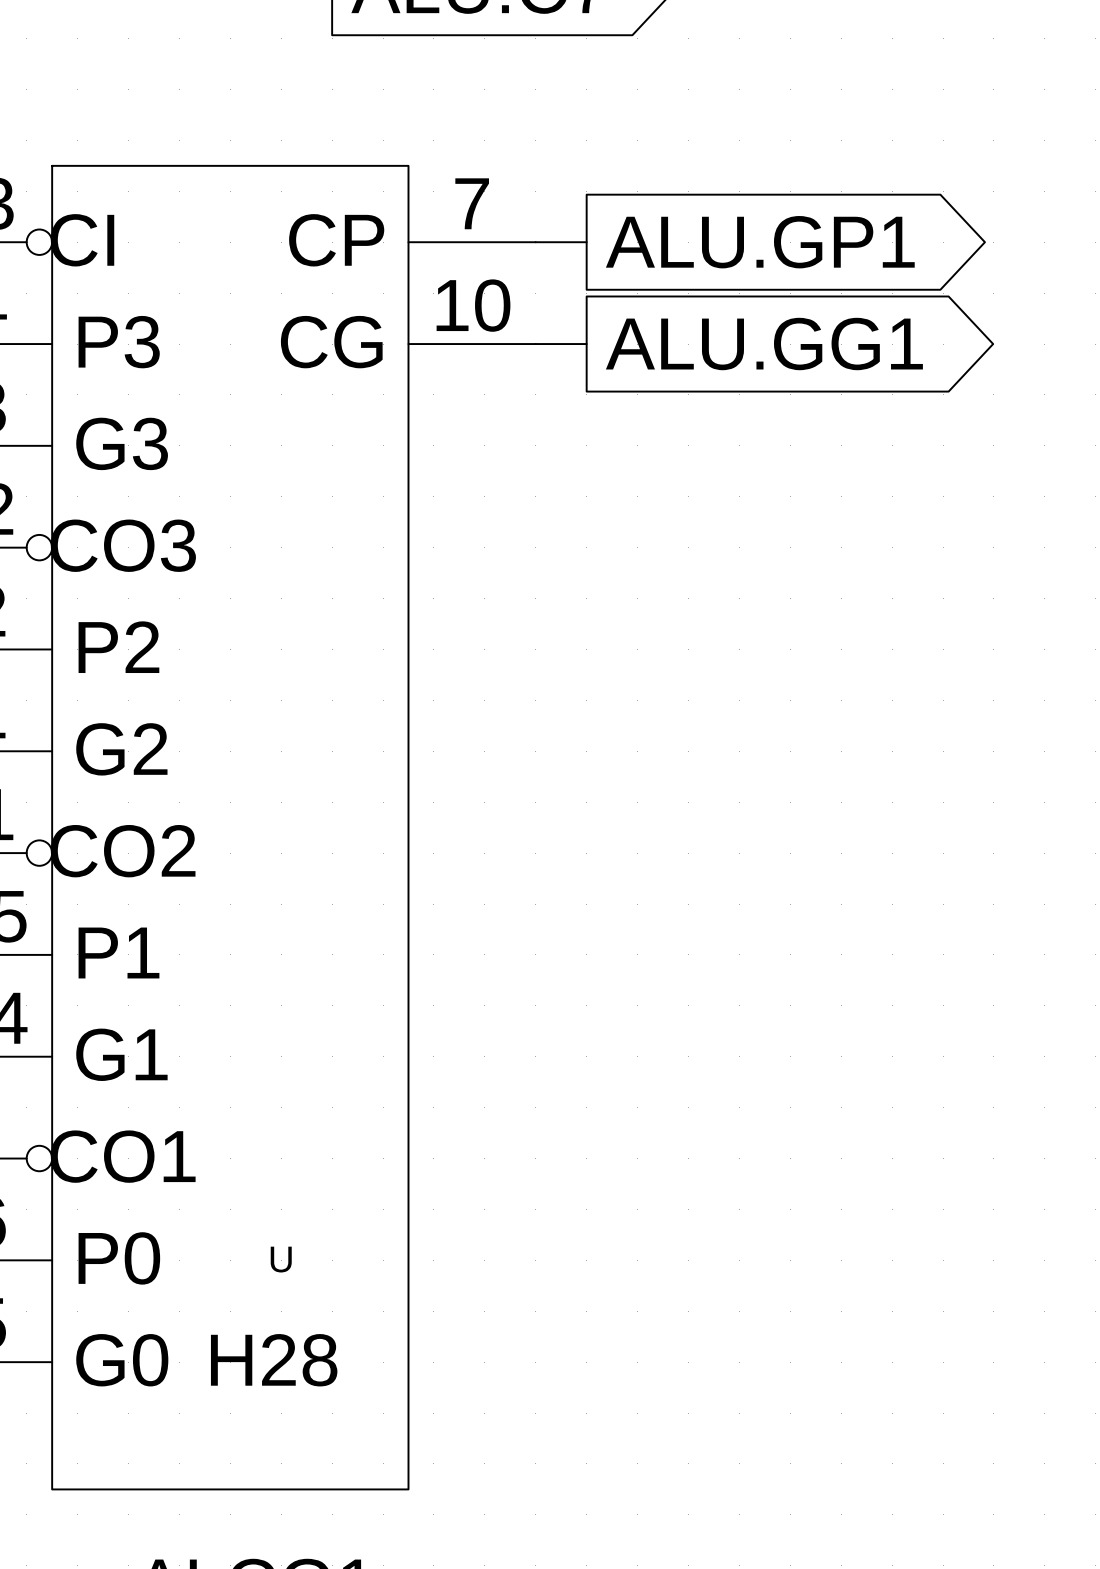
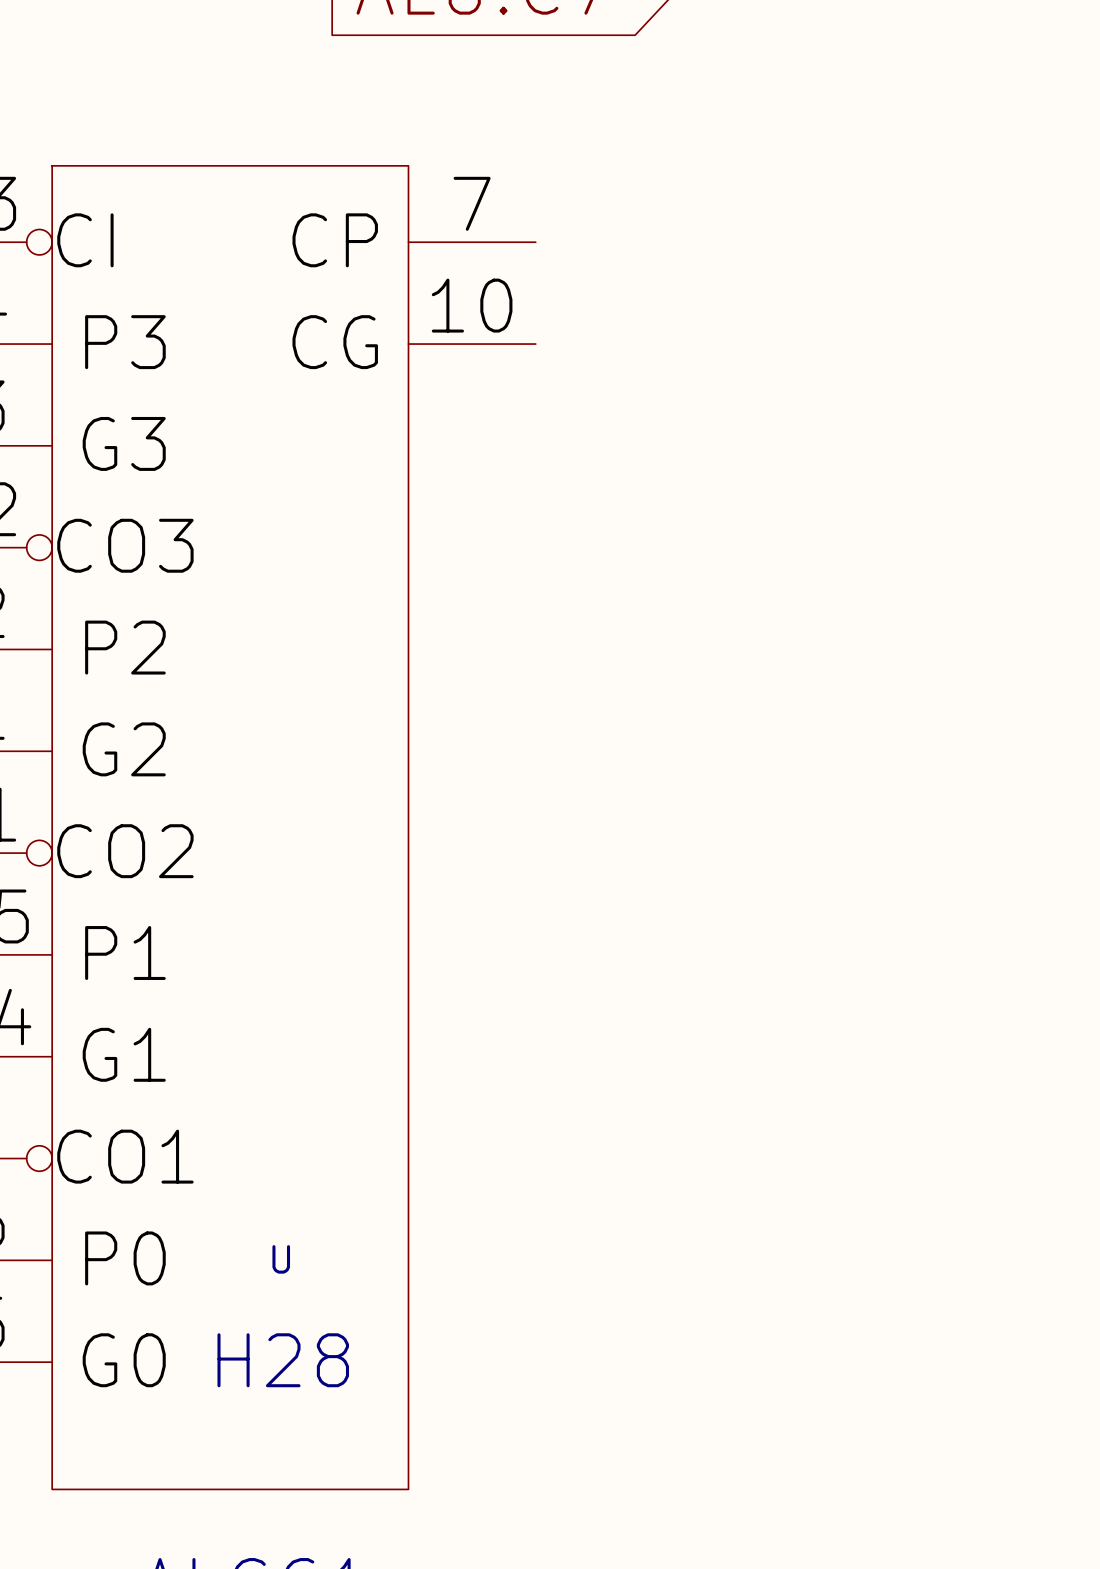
wire: (535, 242) (586, 242) -> none
global label: ALU.GP1 (760, 242) -> none
wire: (535, 344) (586, 344) -> none
global label: ALU.GG1 (764, 344) -> none

